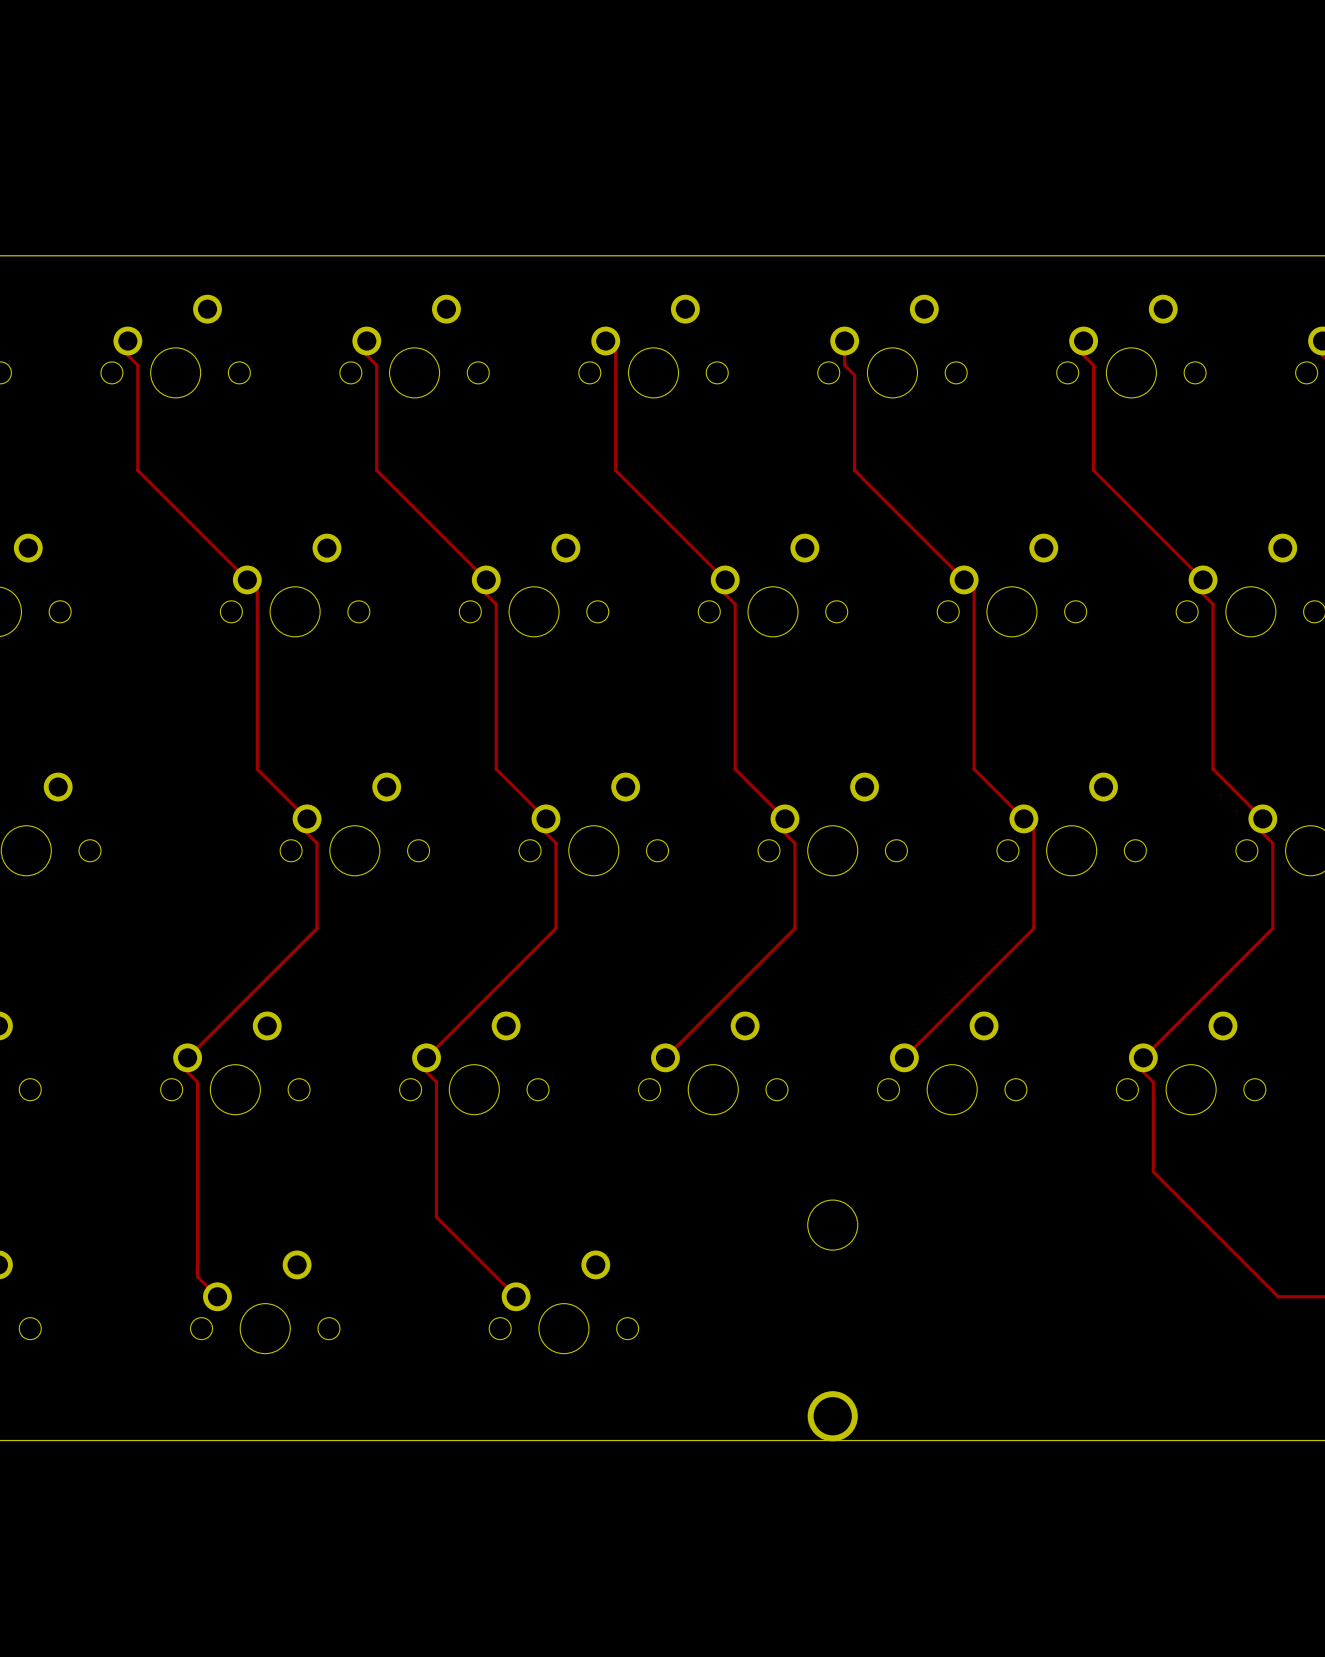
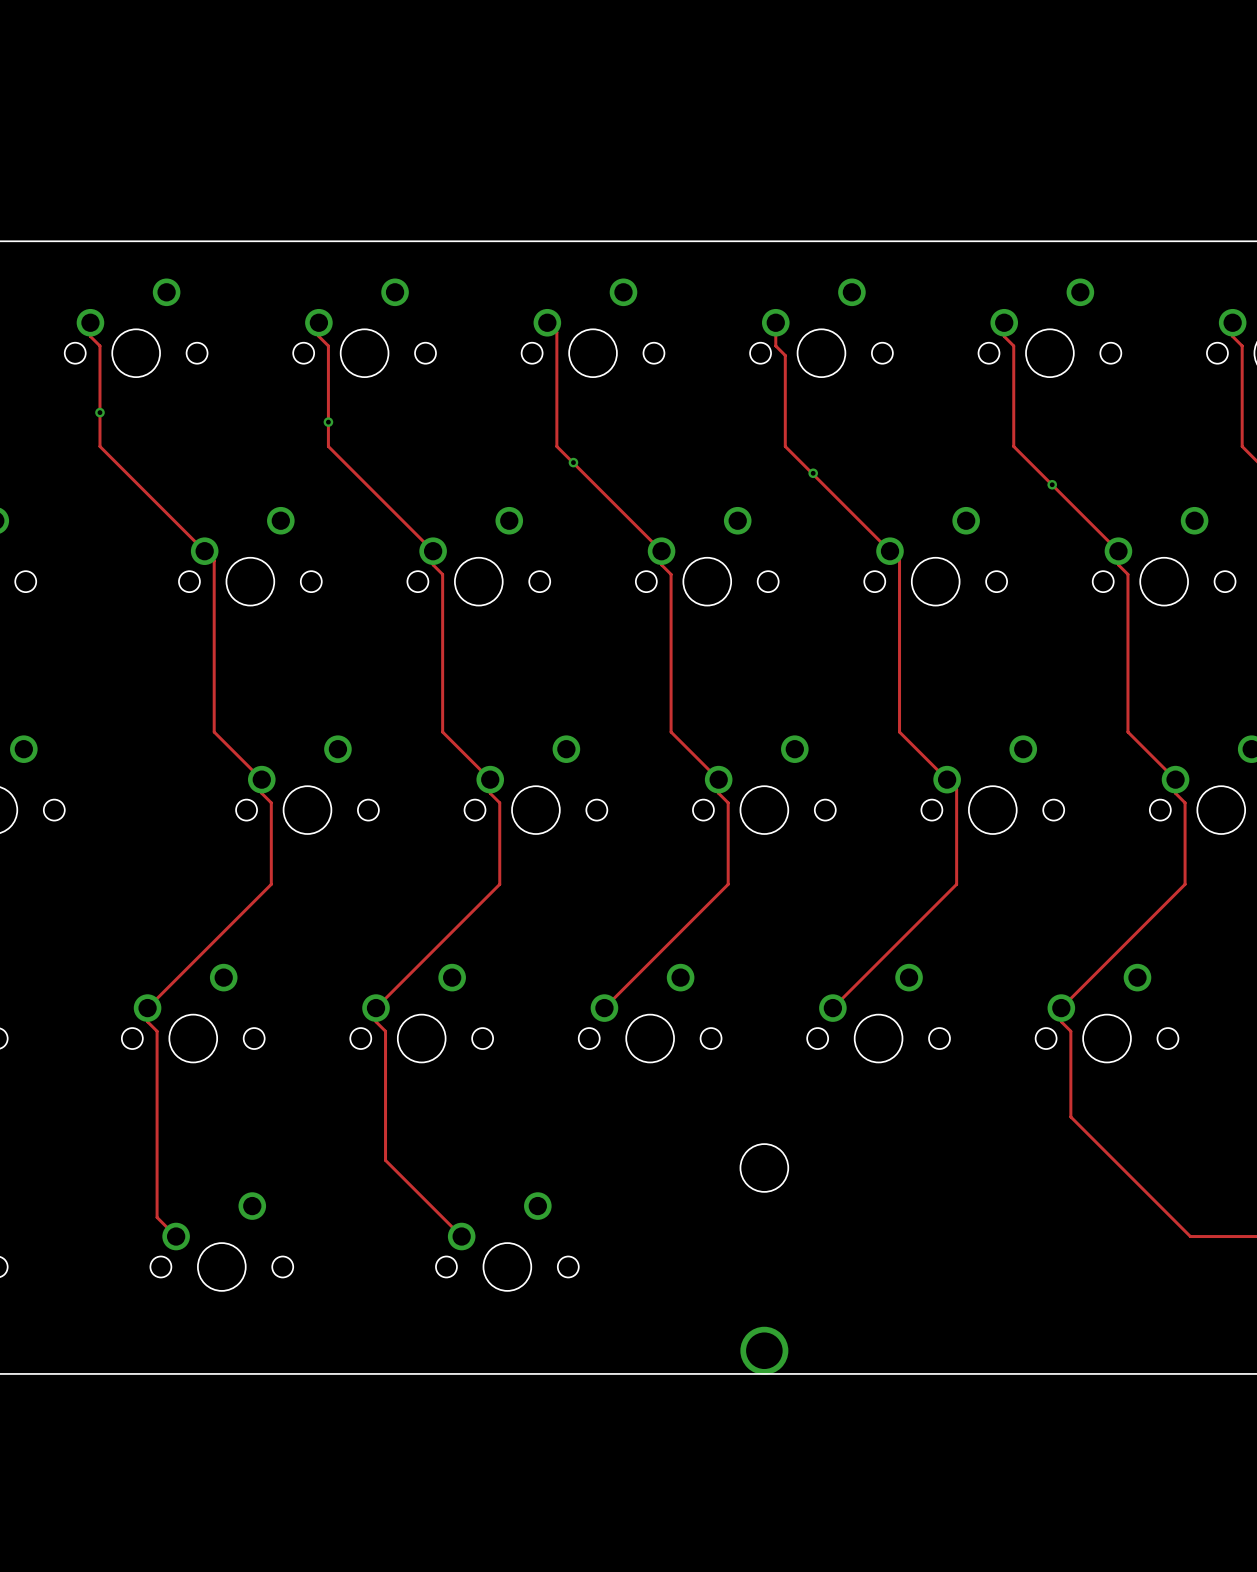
via: none -> (99, 412)
via: none -> (328, 422)
via: none -> (573, 462)
via: none -> (813, 473)
via: none -> (1052, 484)

